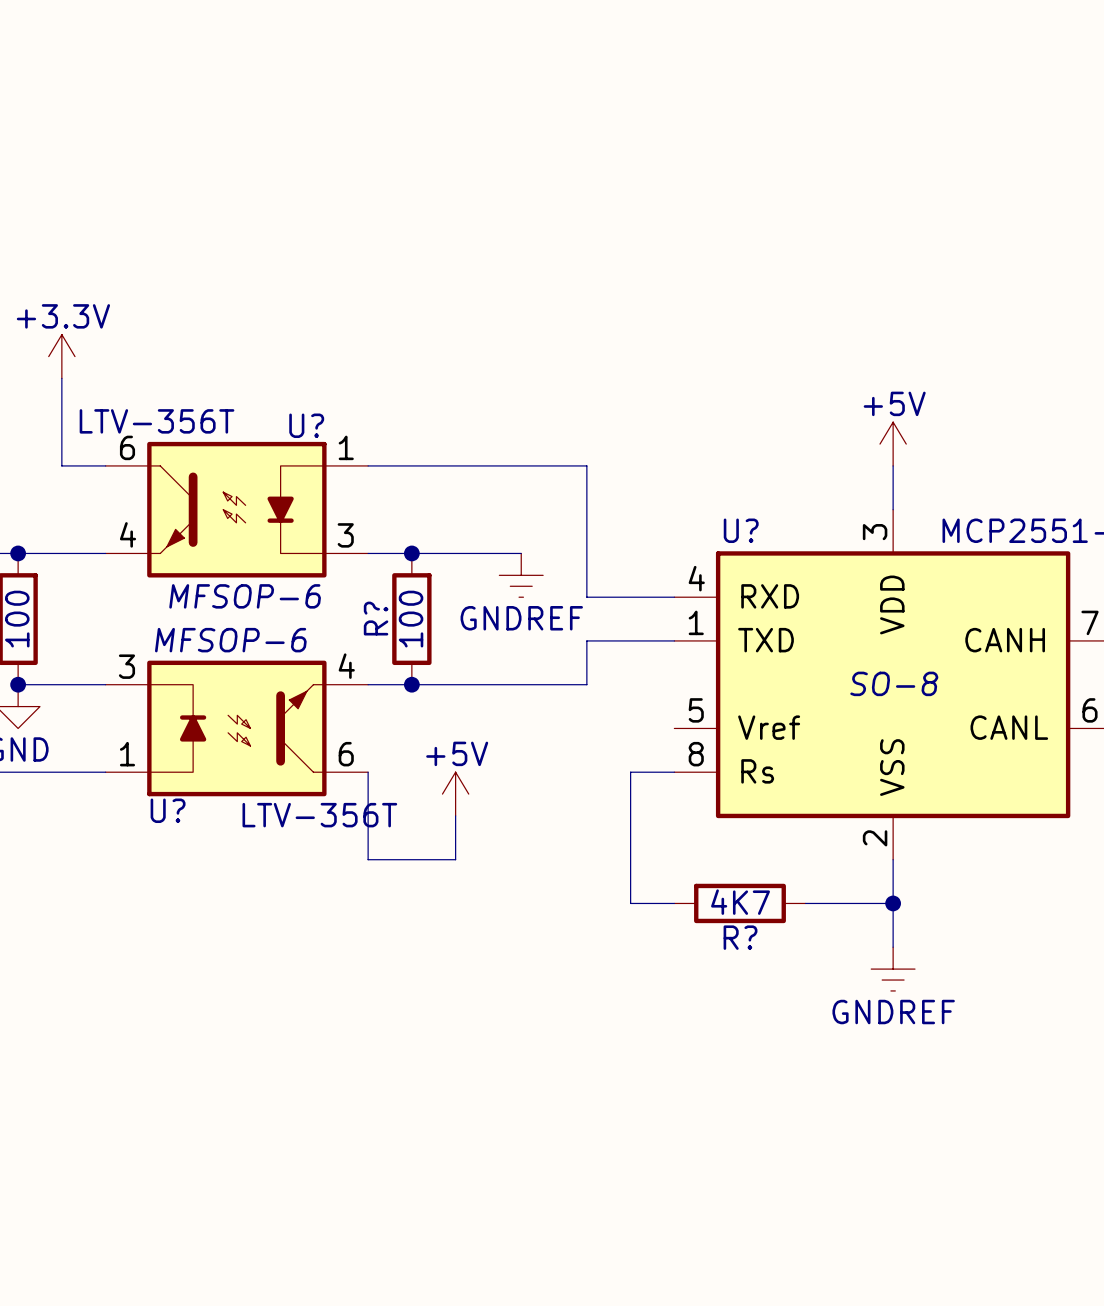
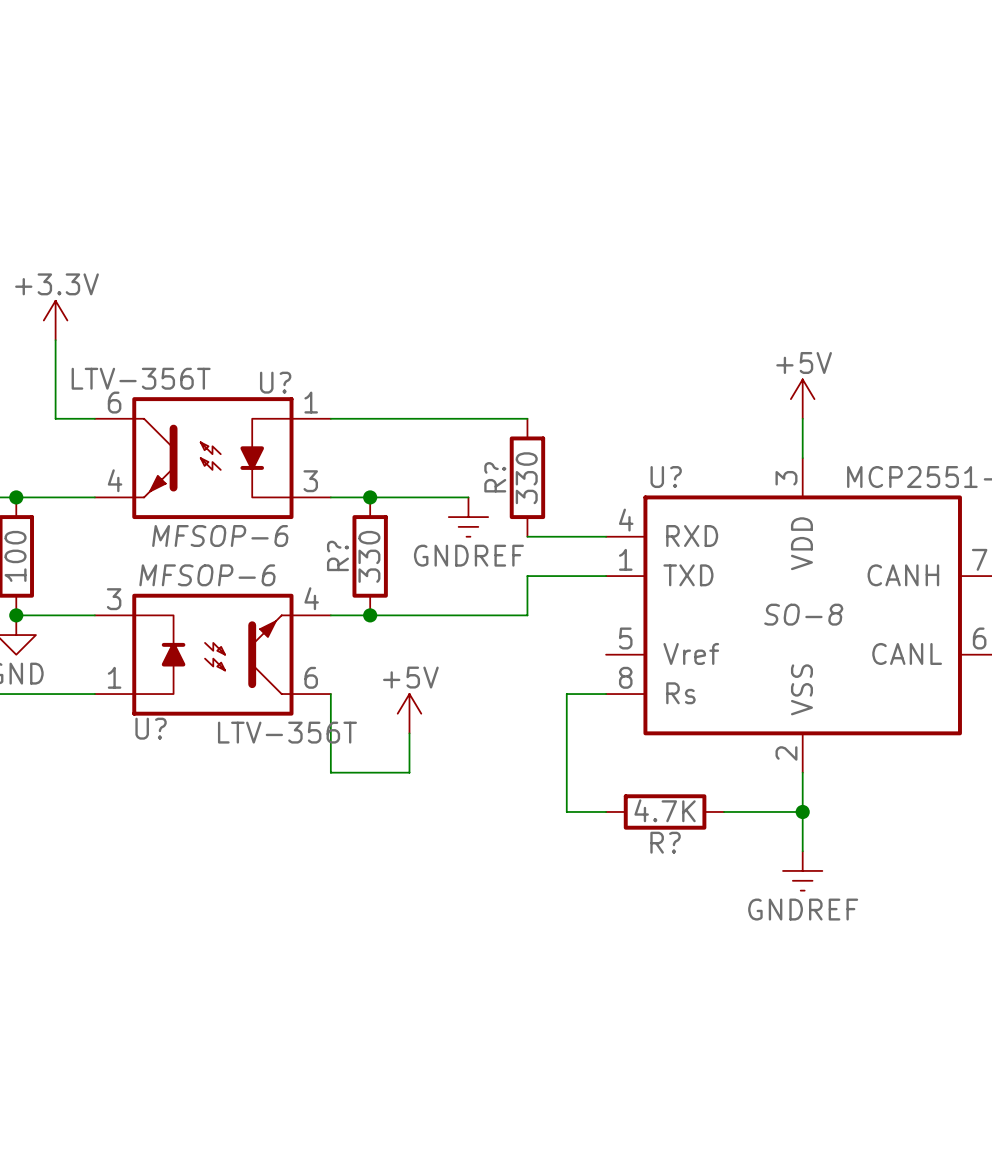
wire: (586, 465) (586, 597) -> none
R?: none -> 330 (527, 477)
R? value: 100 (411, 619) -> 330 (369, 556)
R? value: 4K7 (740, 902) -> 4.7K (665, 810)

